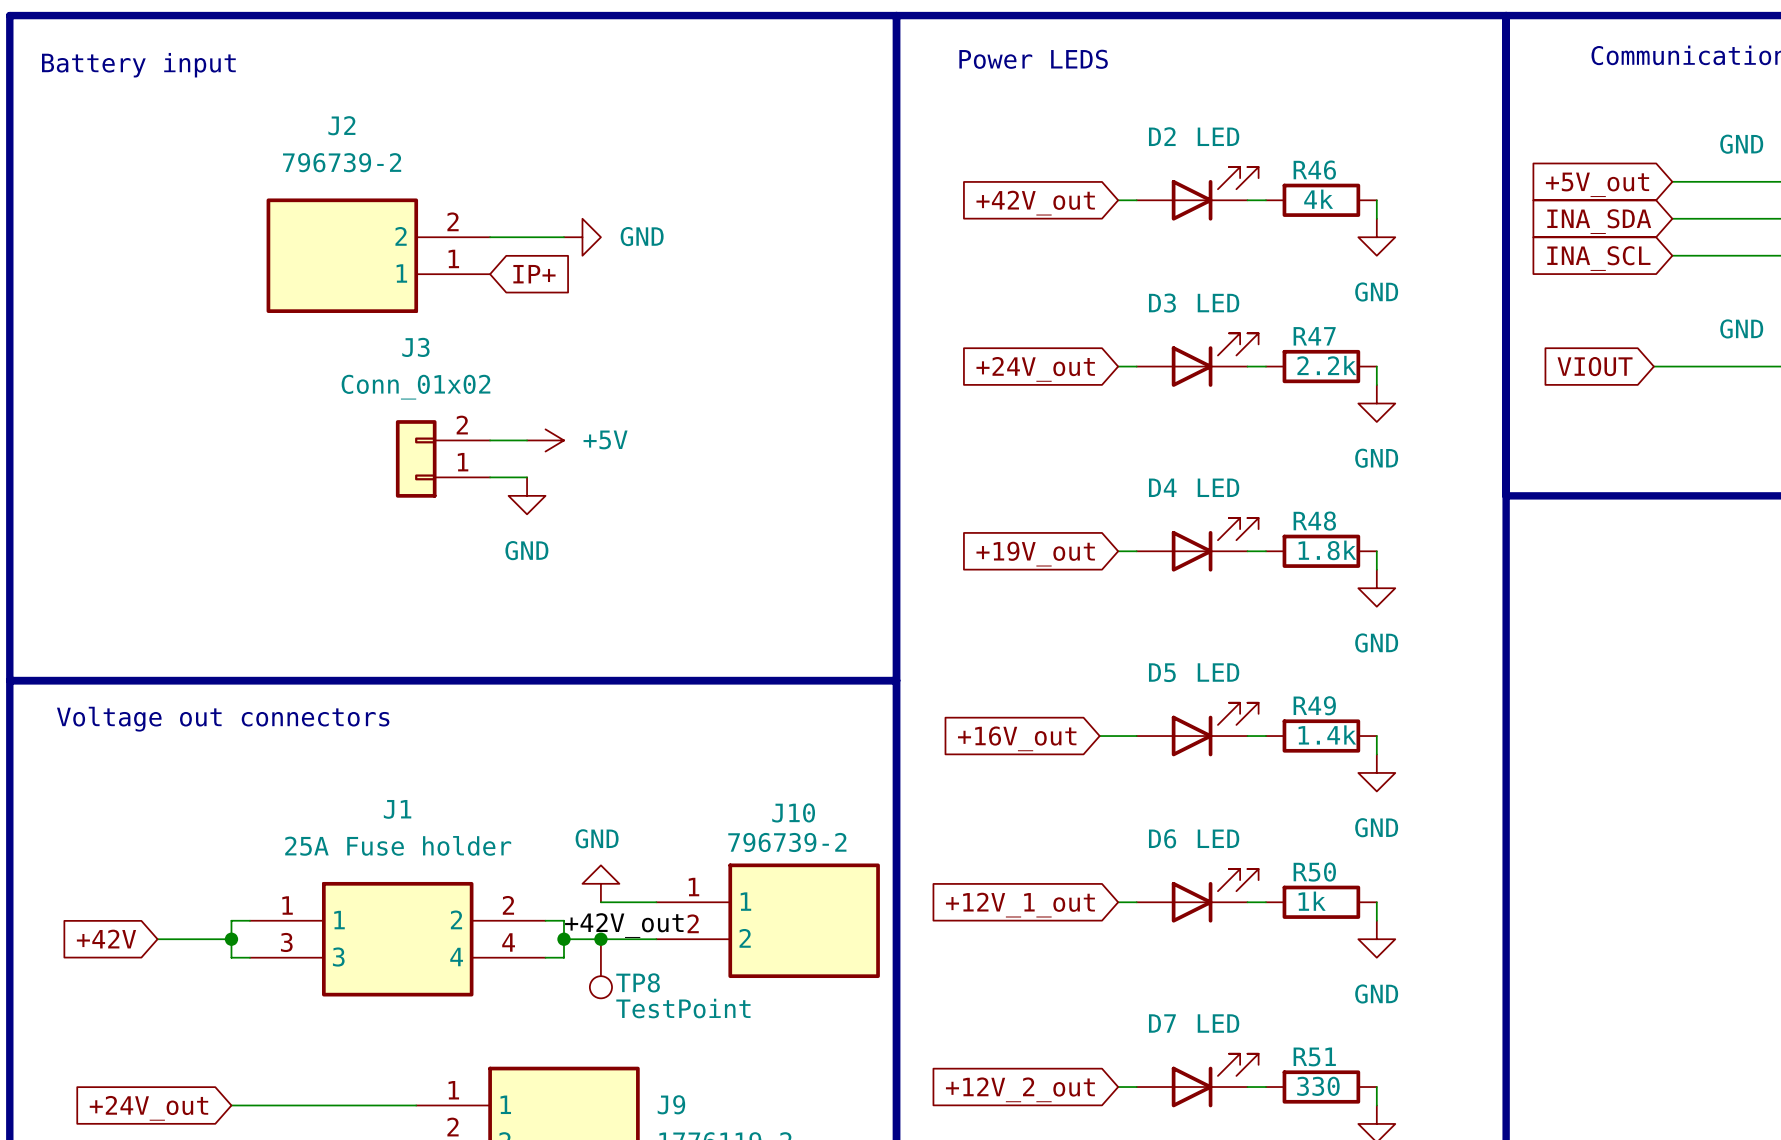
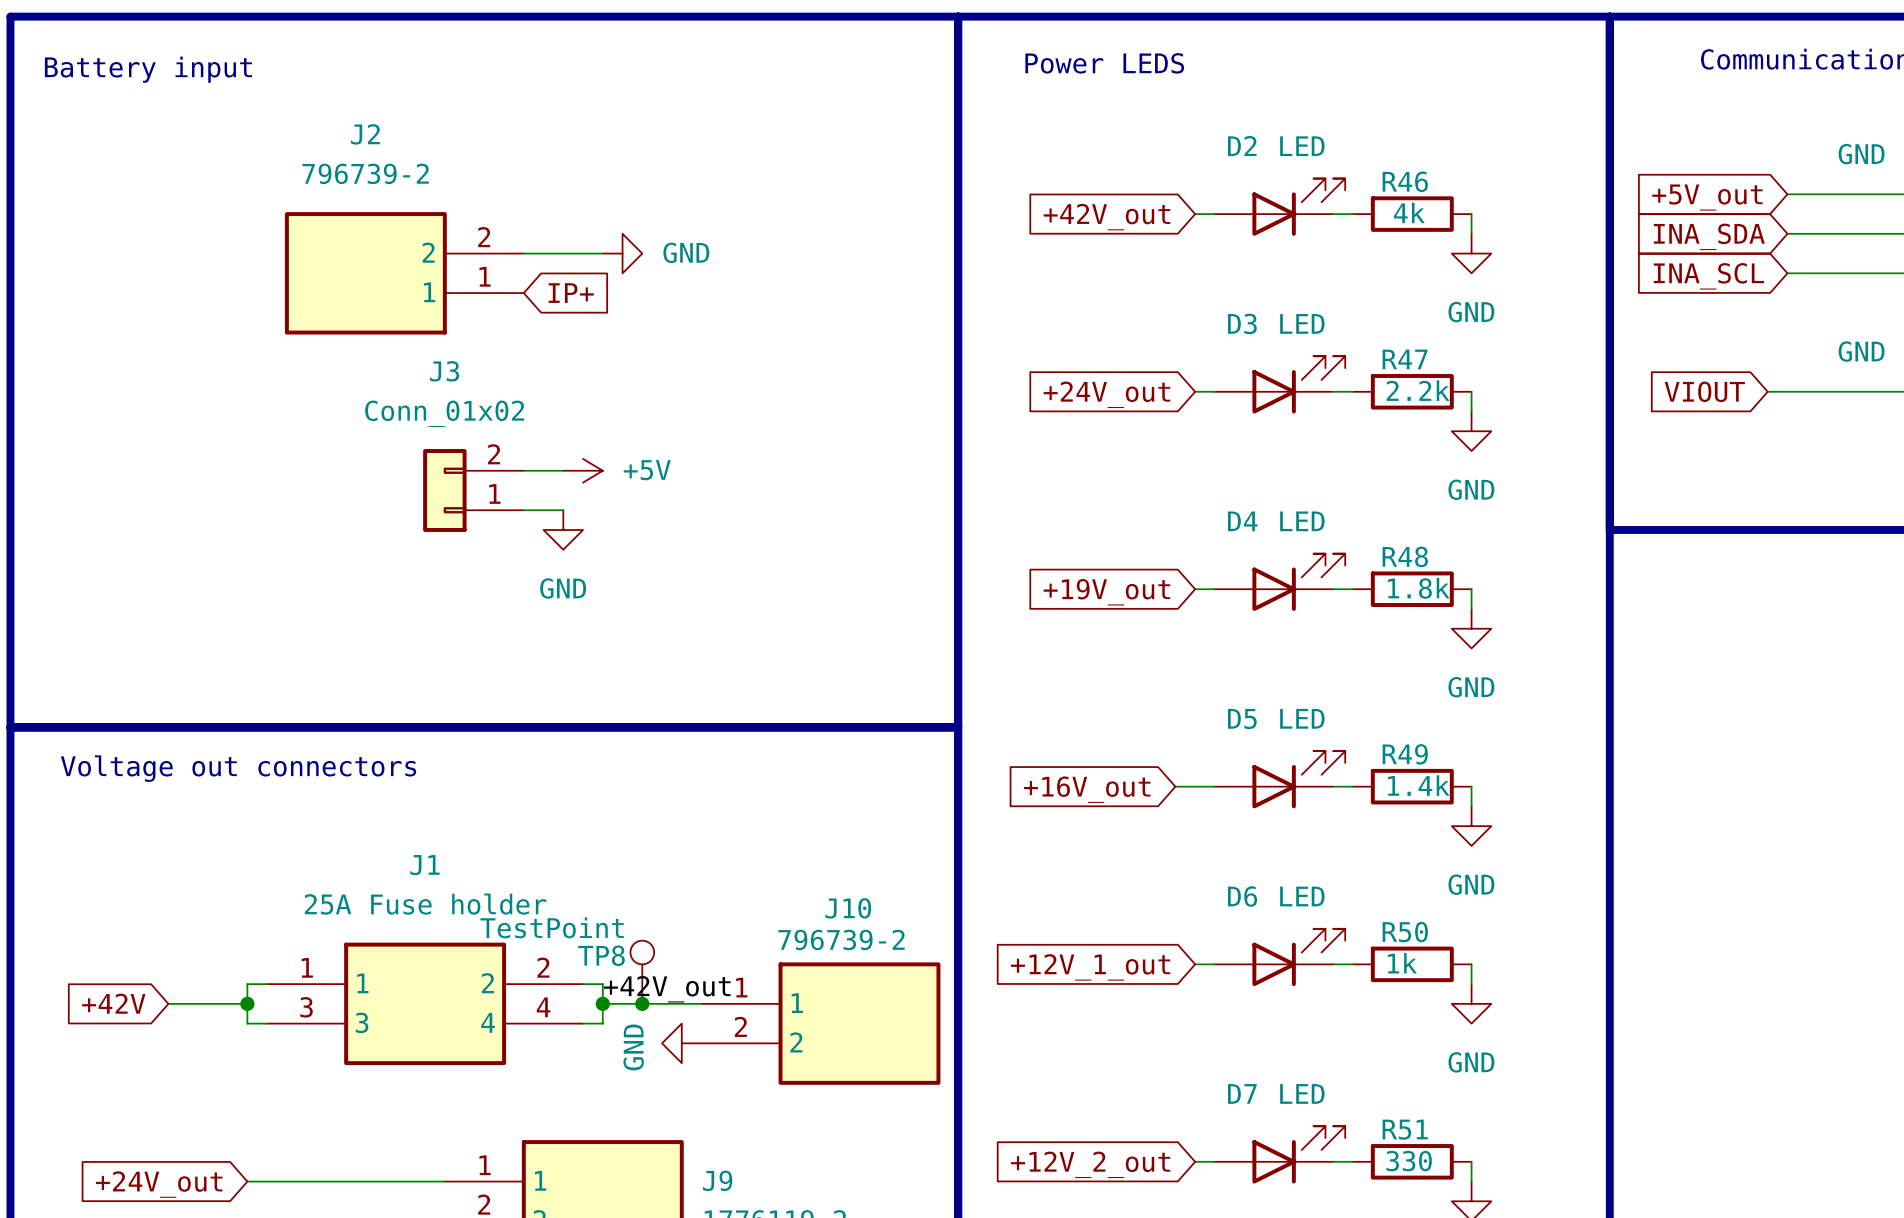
power symbol rotation: 0° (600, 883) -> 90° counterclockwise (681, 1043)
power symbol position: GND (600, 883) -> GND (681, 1043)
wire: (600, 902) (656, 902) -> none
J10 position: (768, 920) -> (820, 1023)
TP8 position: (600, 968) -> (642, 972)
TP8 rotation: 0° (600, 987) -> 180° (642, 952)

